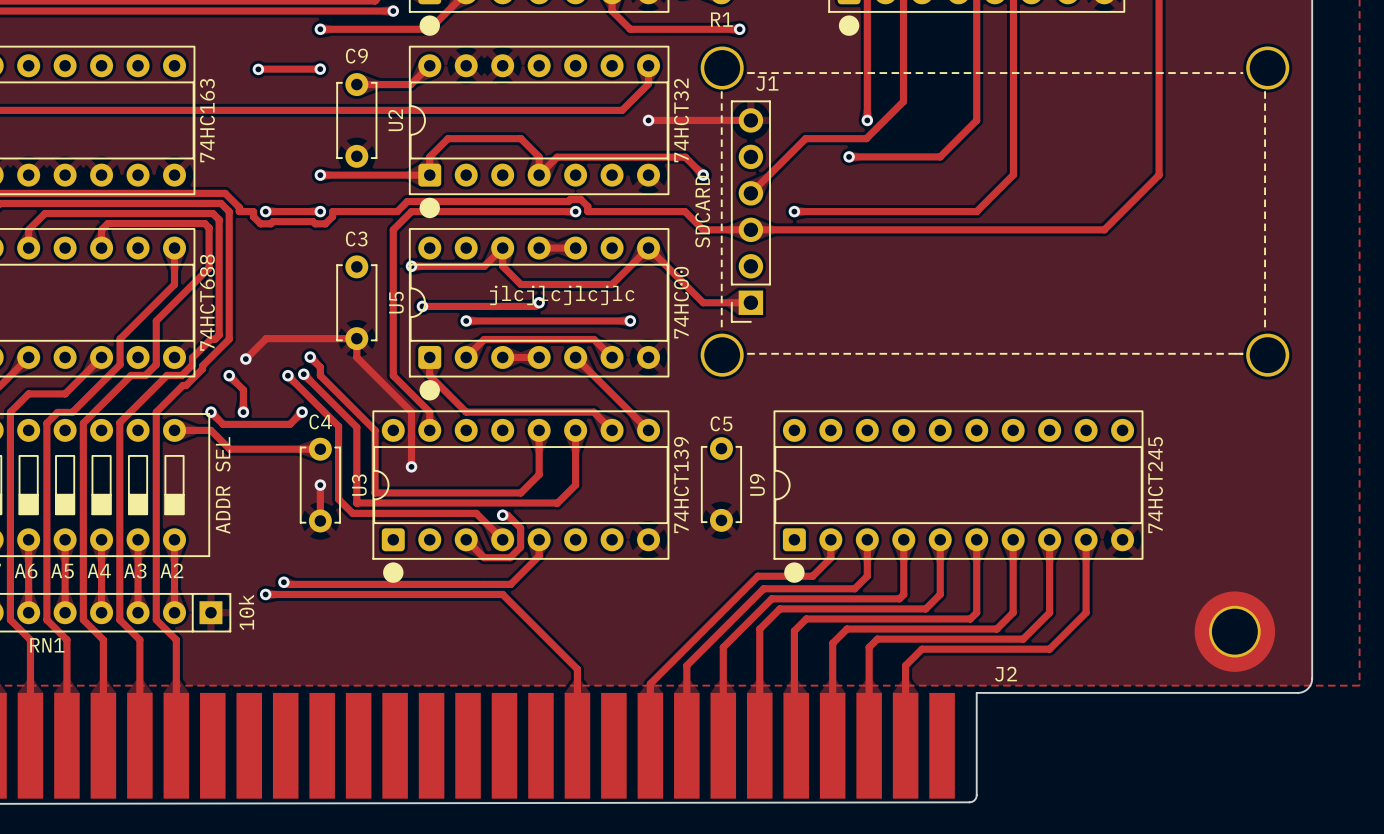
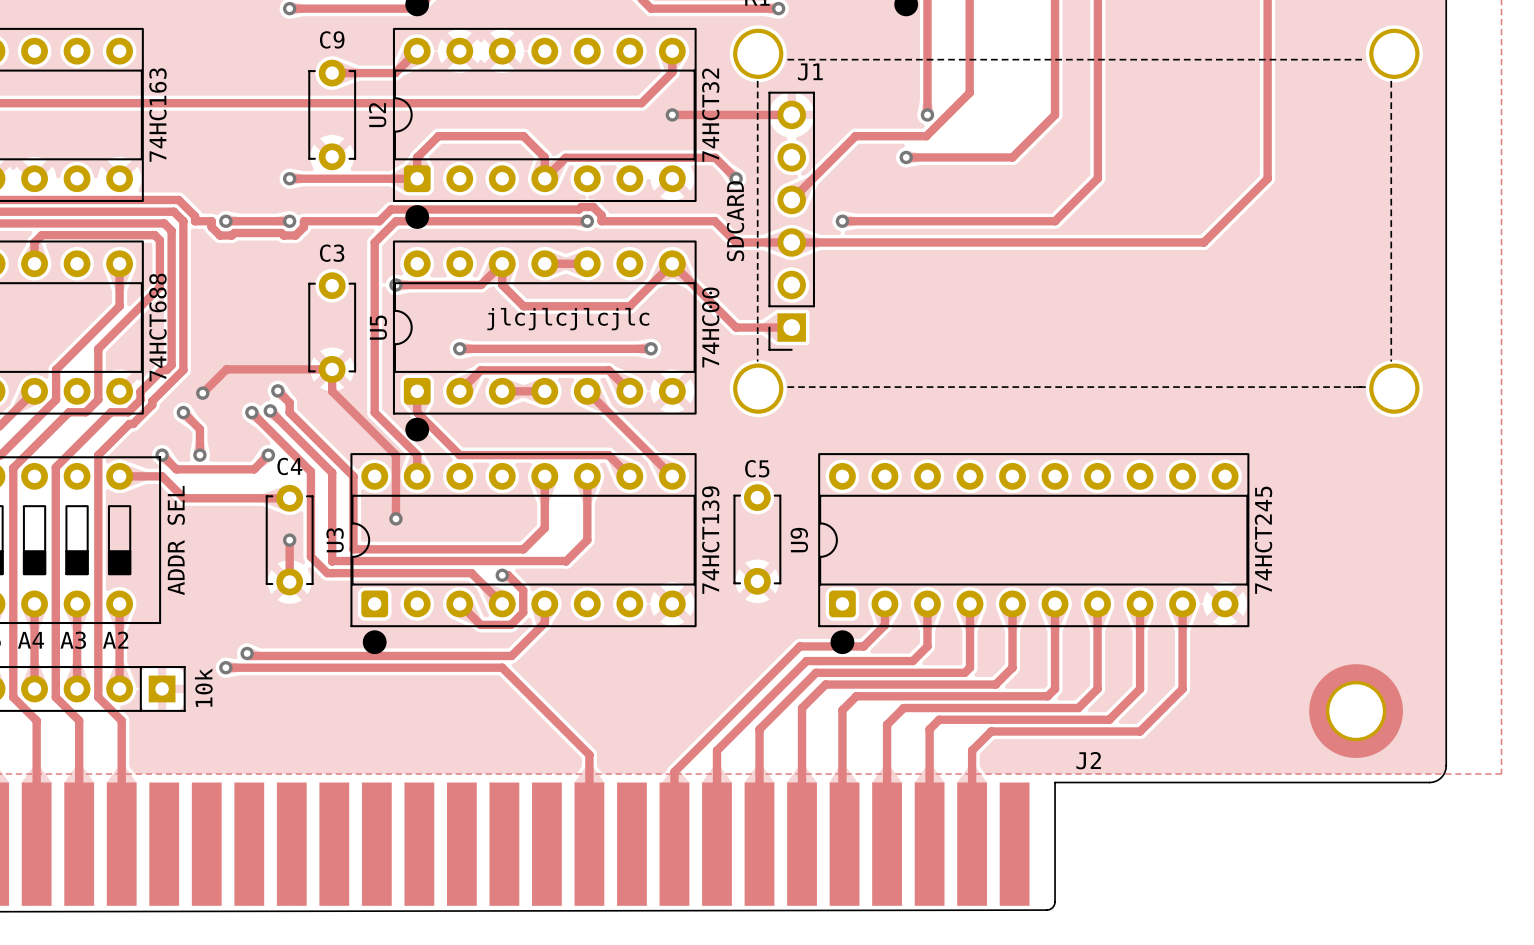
via: (258, 69) -> none
track: (320, 69) (258, 69) -> none
via: (320, 69) -> none
track: (539, 302) (535, 306) (422, 306) -> none
via: (539, 302) -> none
via: (422, 306) -> none

